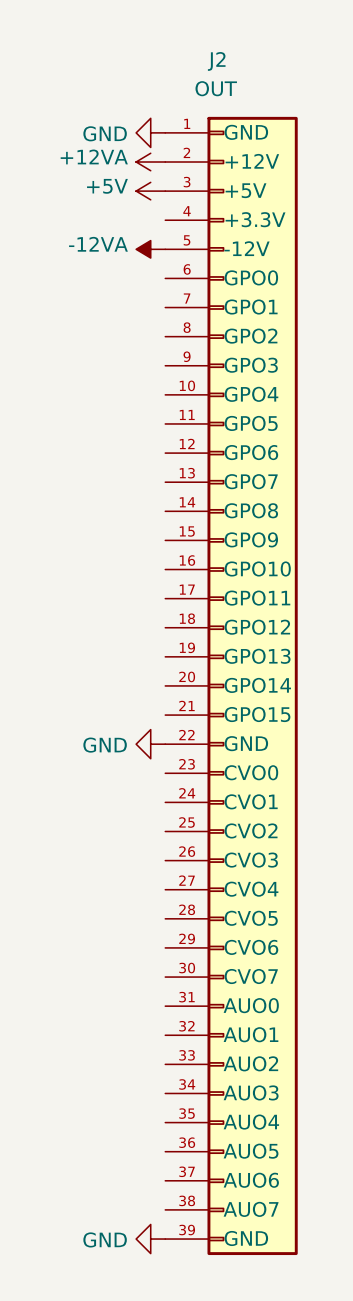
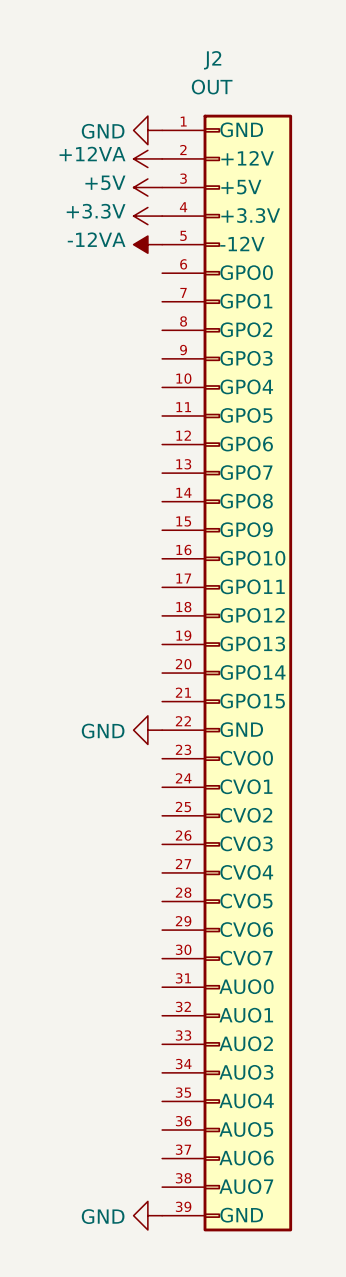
power symbol: none -> +3.3V (147, 216)

